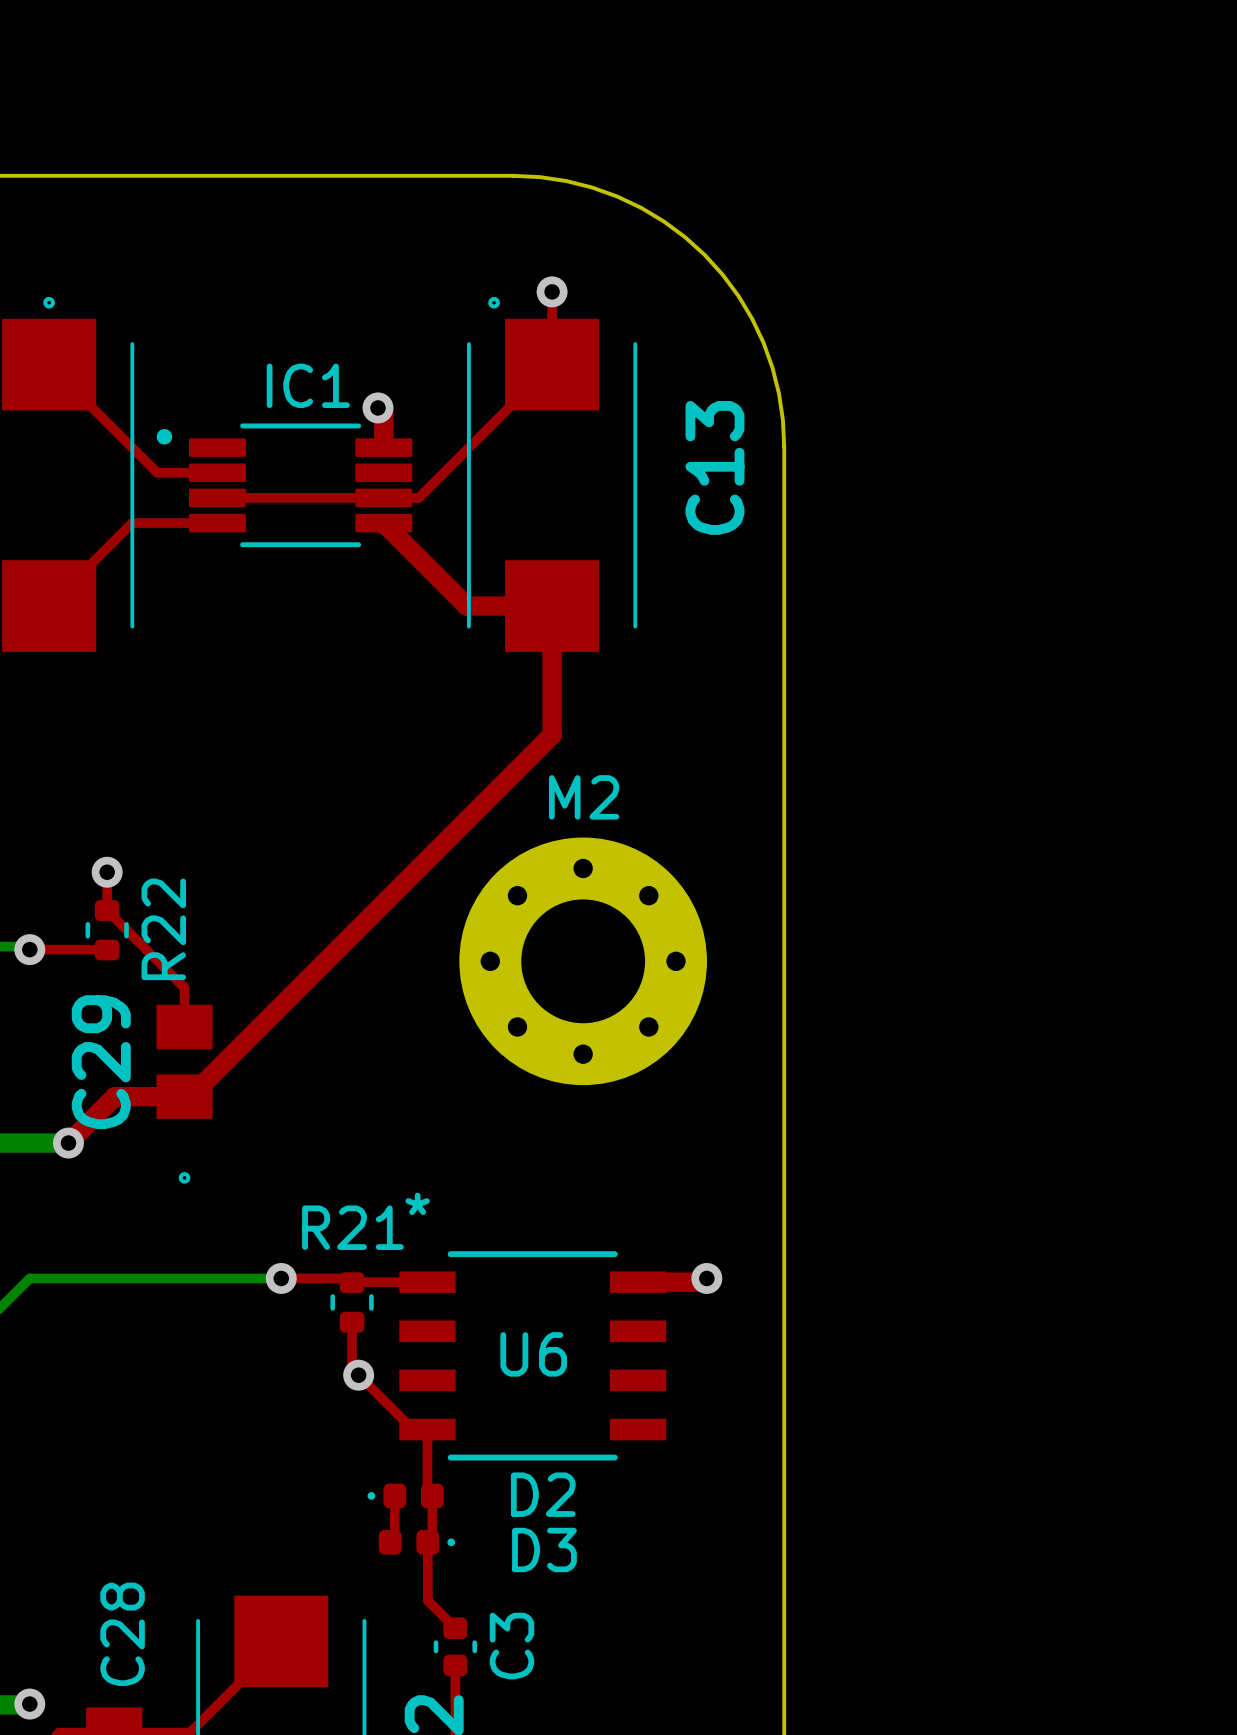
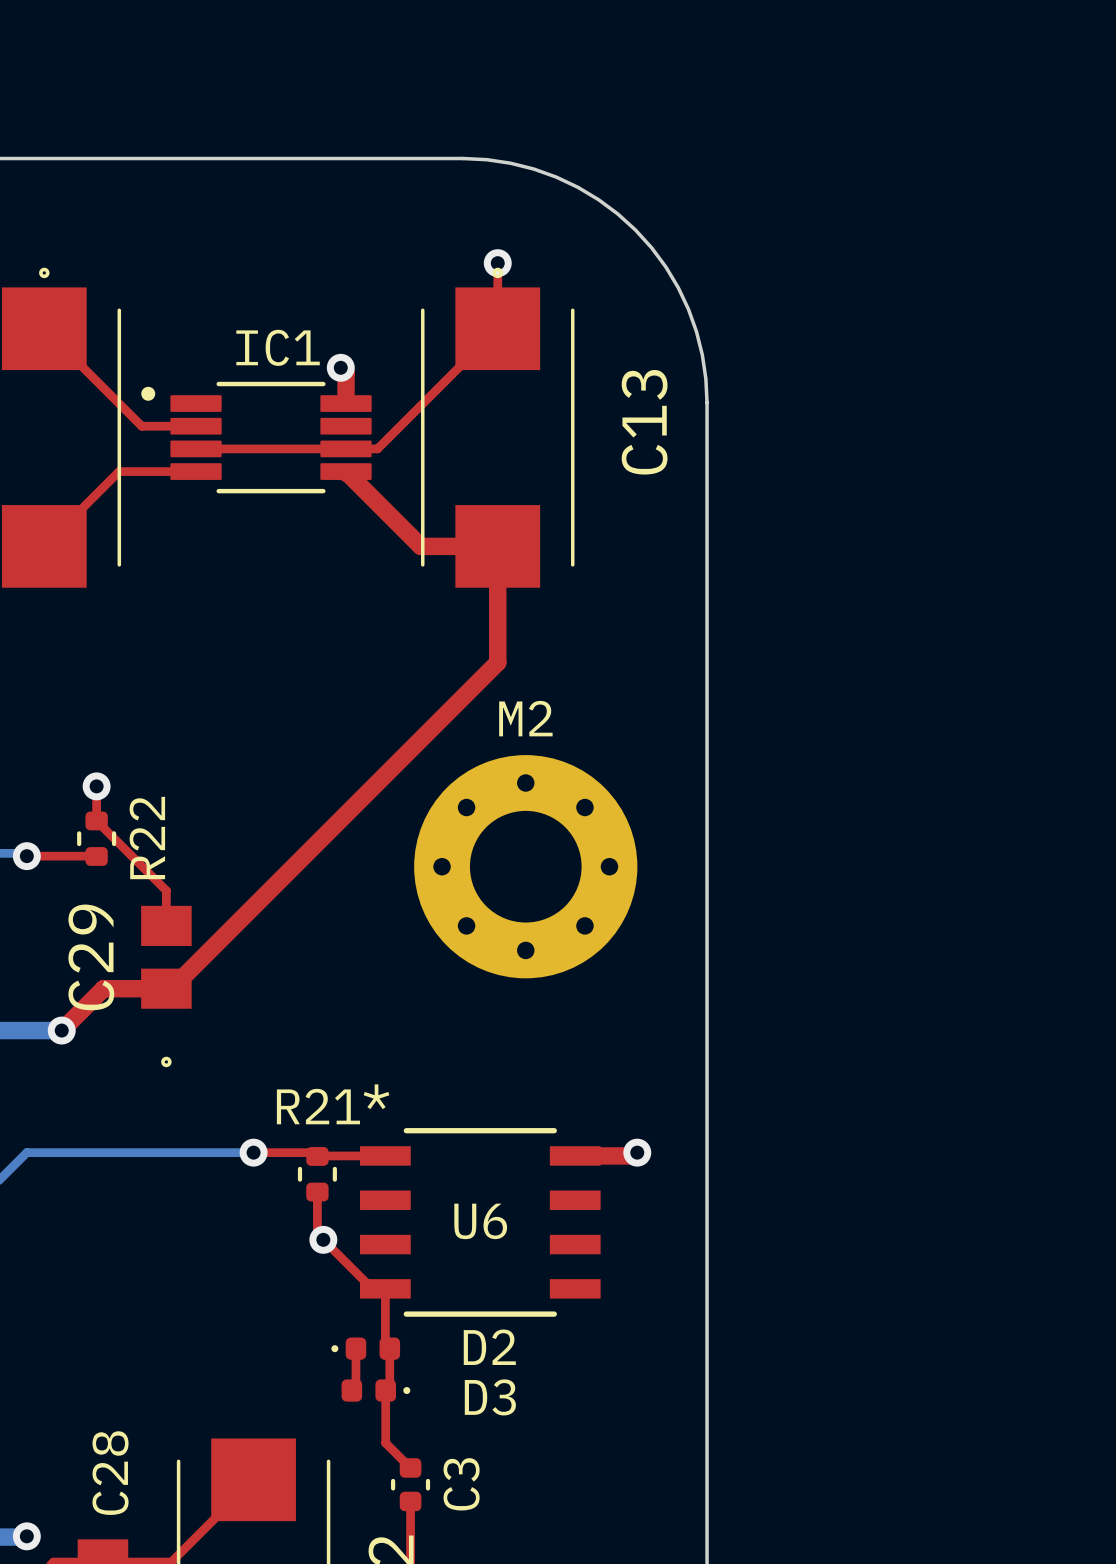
C13 footprint: [466, 296, 638, 652] -> [421, 267, 575, 588]

